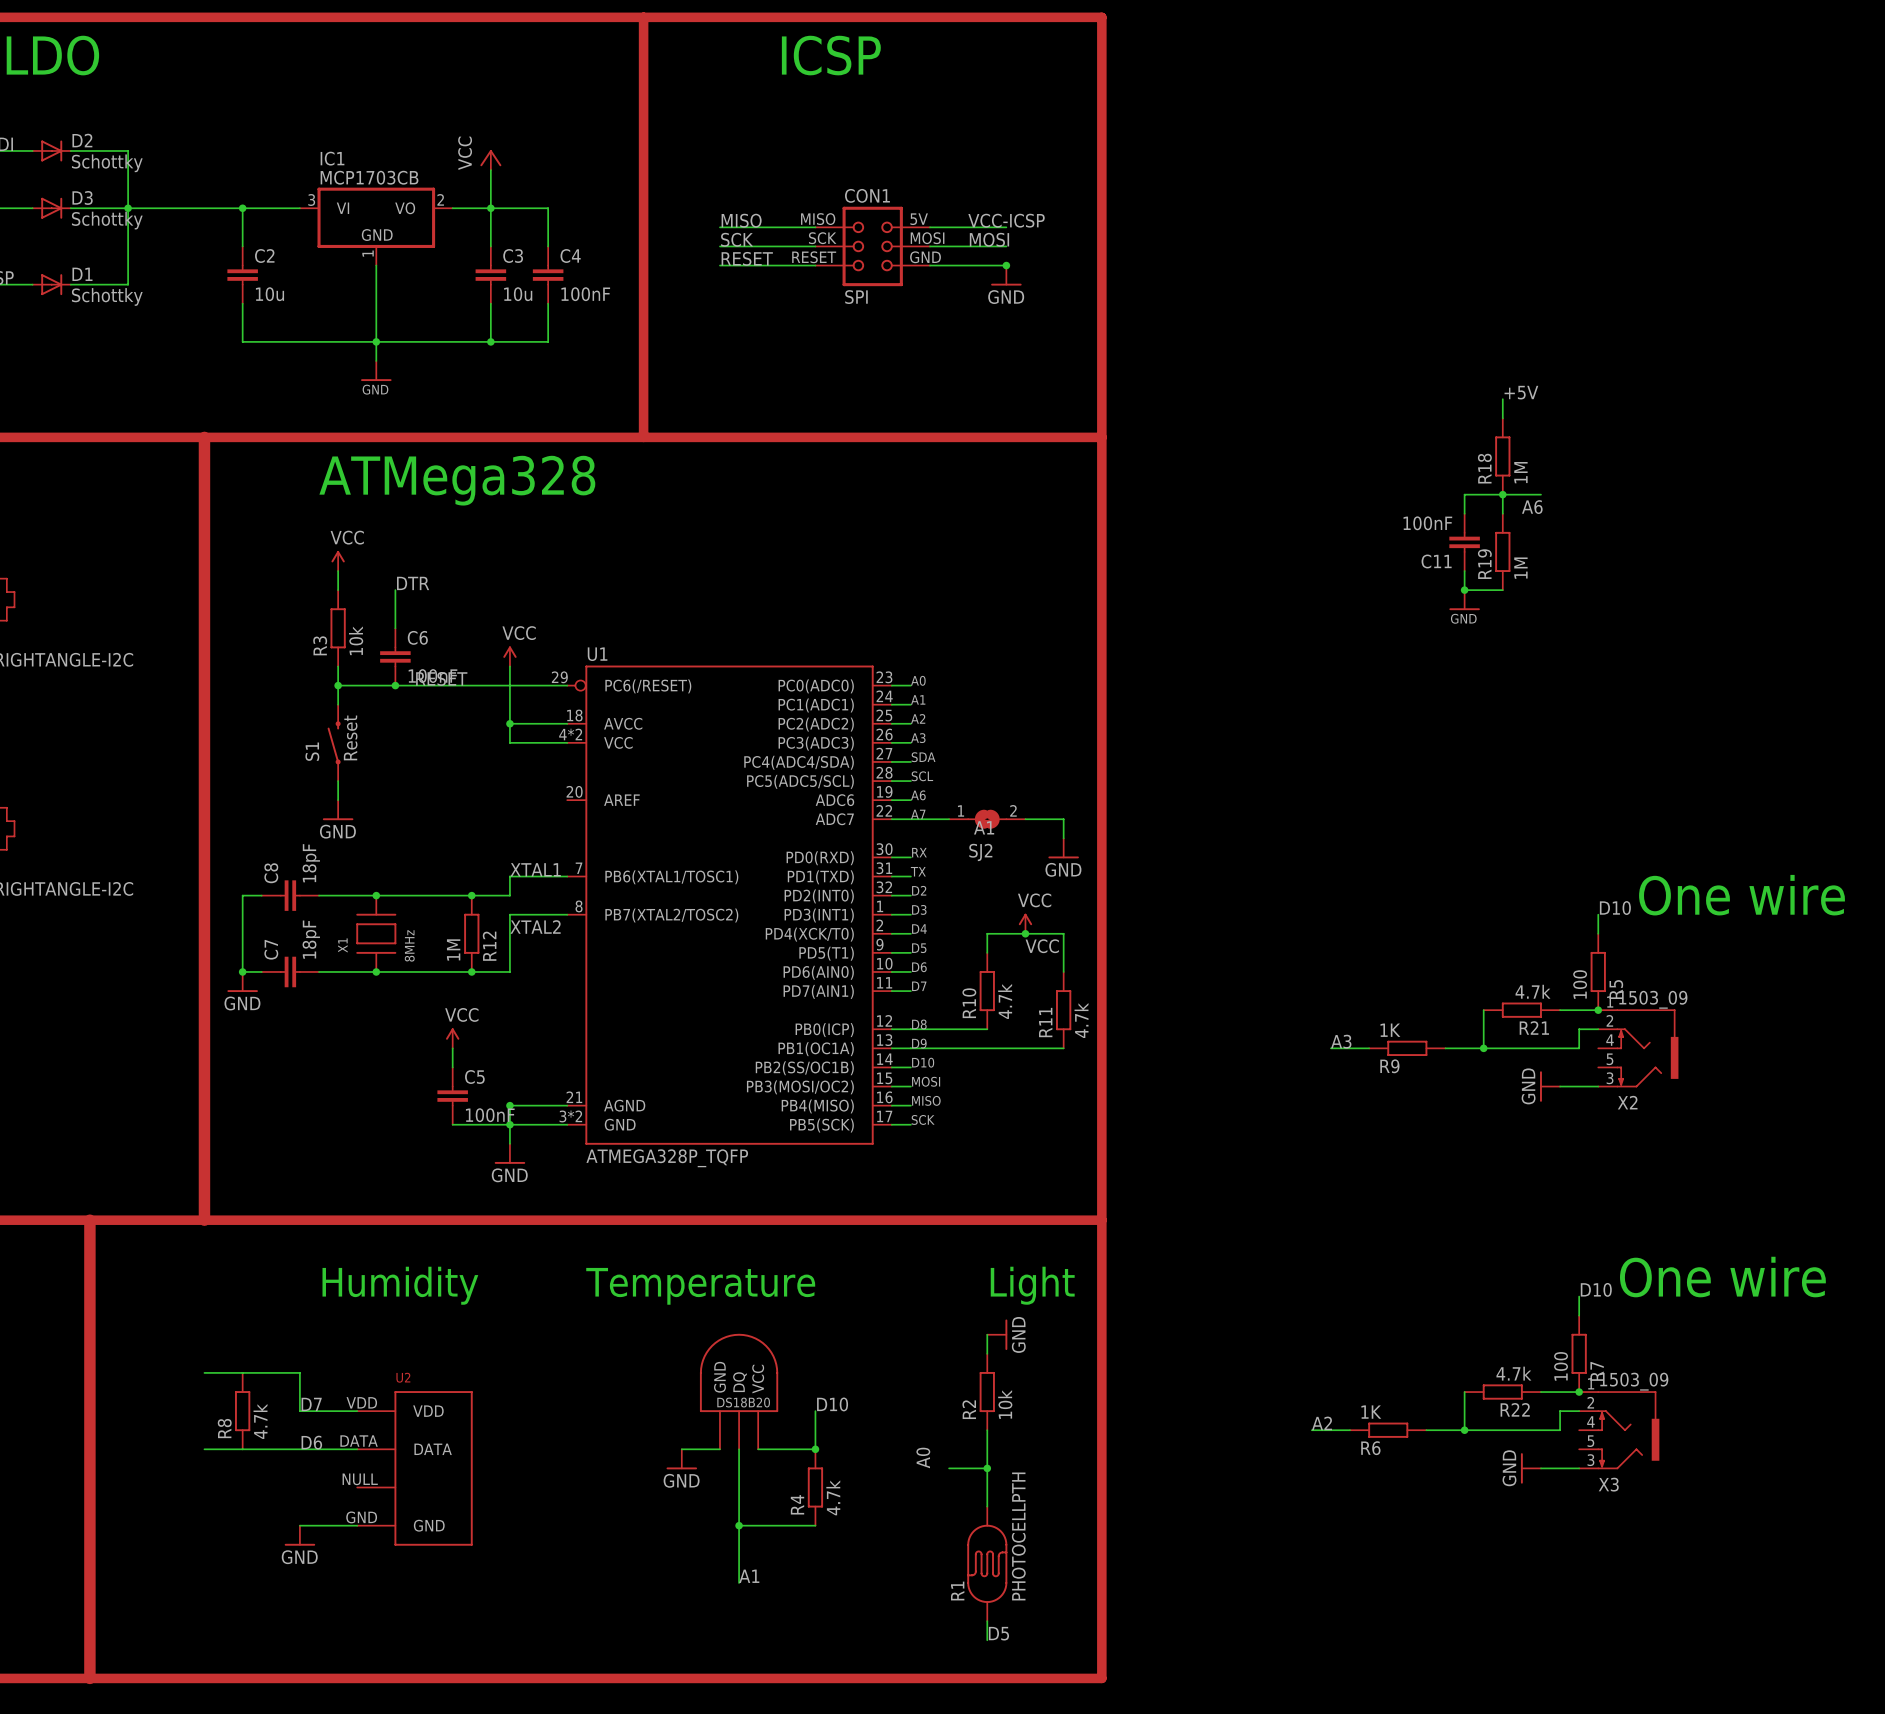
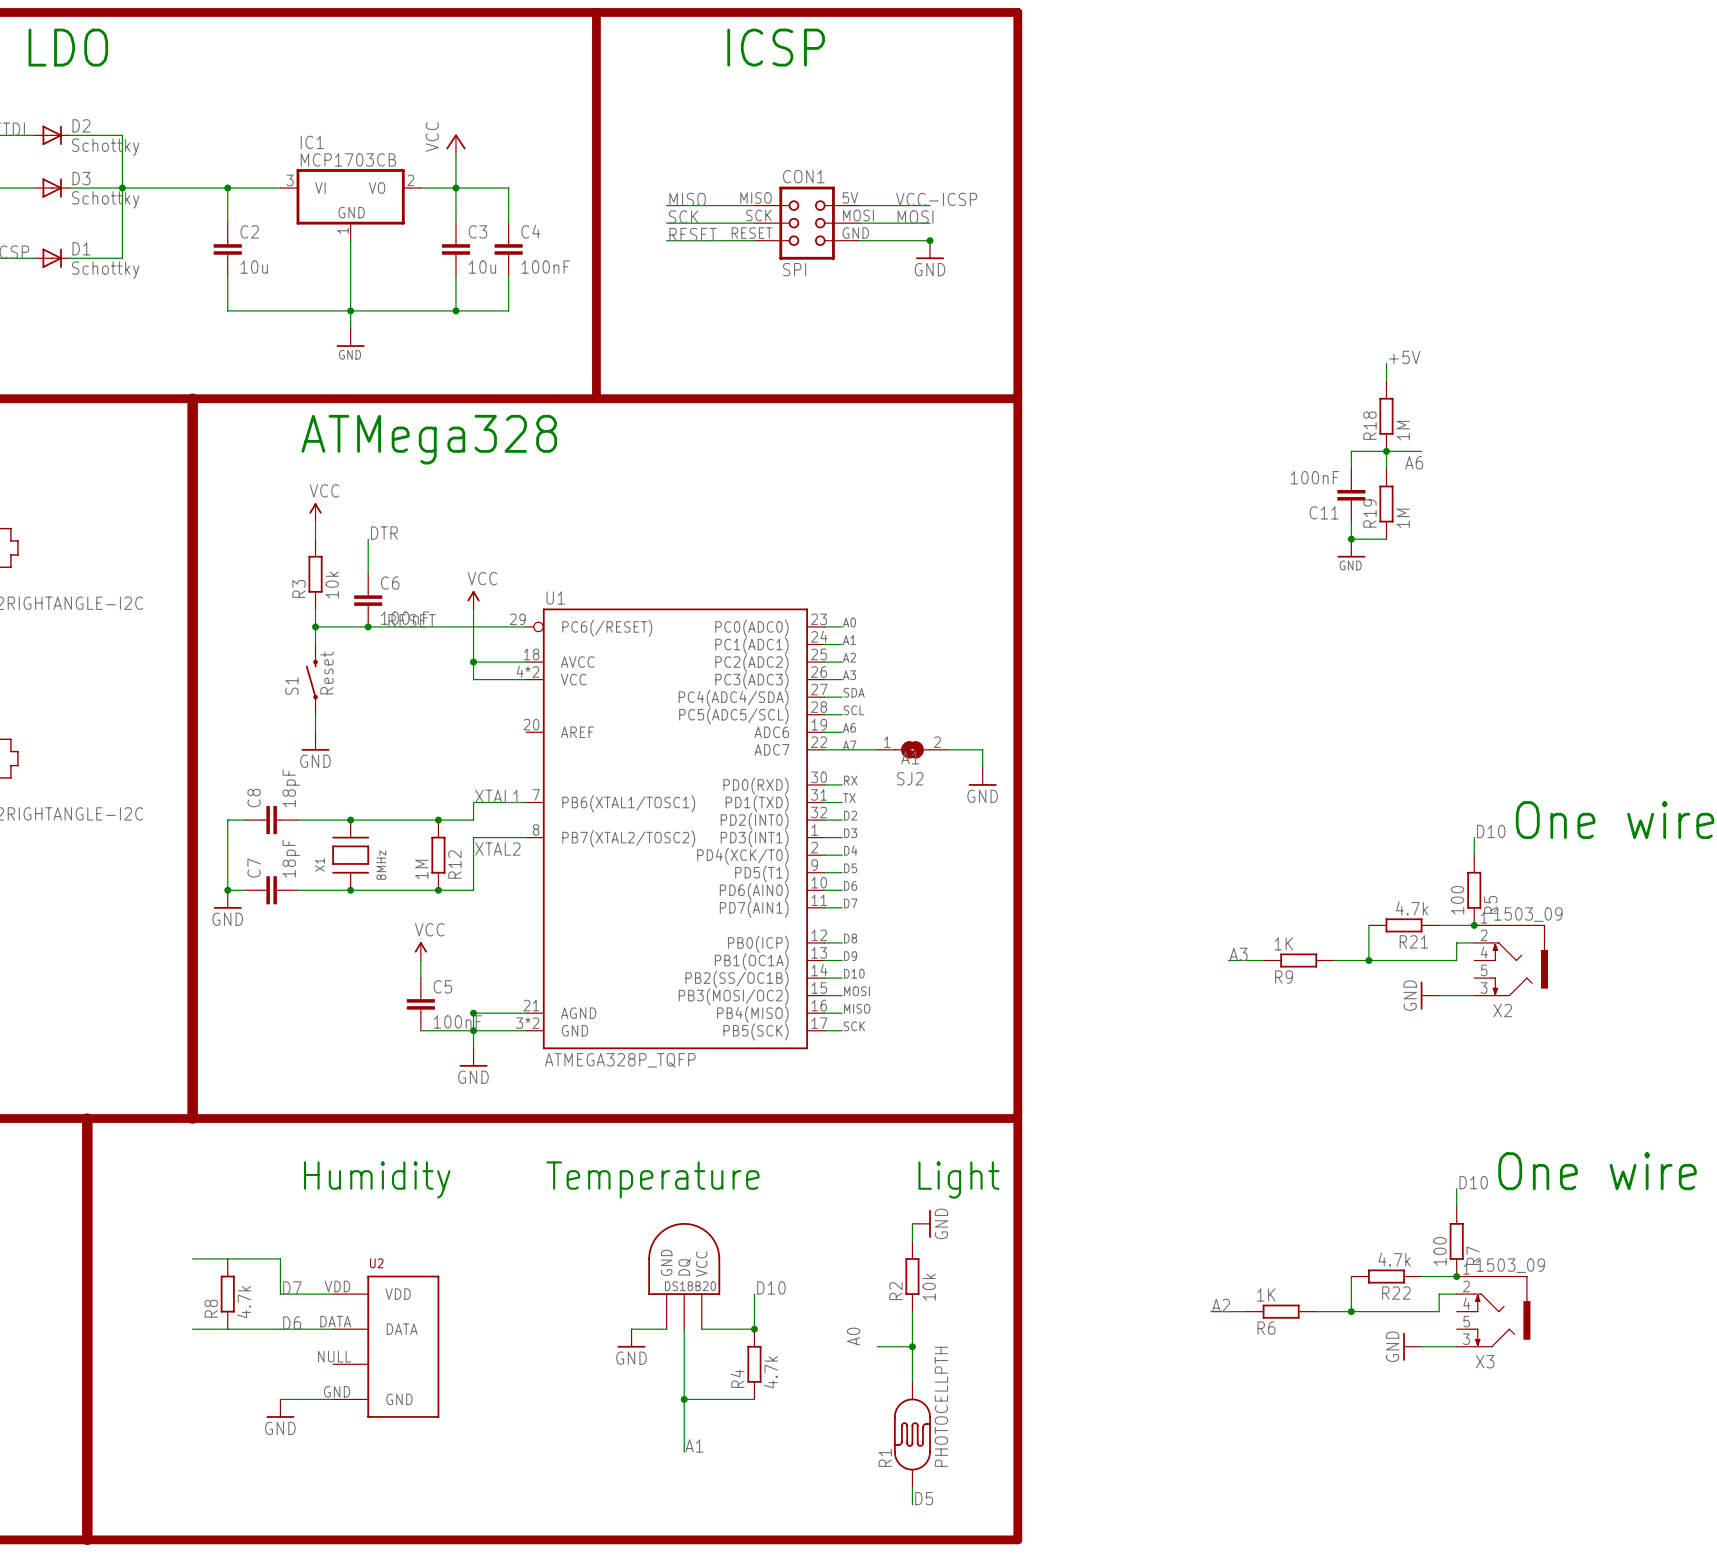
power symbol: VCC (1025, 923) -> none
junction: (1025, 933) -> none
label: VCC (1042, 946) -> none
wire: (987, 952) (987, 933) (1063, 933) (1063, 971) -> none
R10: 4.7k (987, 991) -> none
R11: 4.7k (1063, 1010) -> none
wire: (910, 1029) (987, 1029) -> none
wire: (910, 1048) (1063, 1048) -> none

